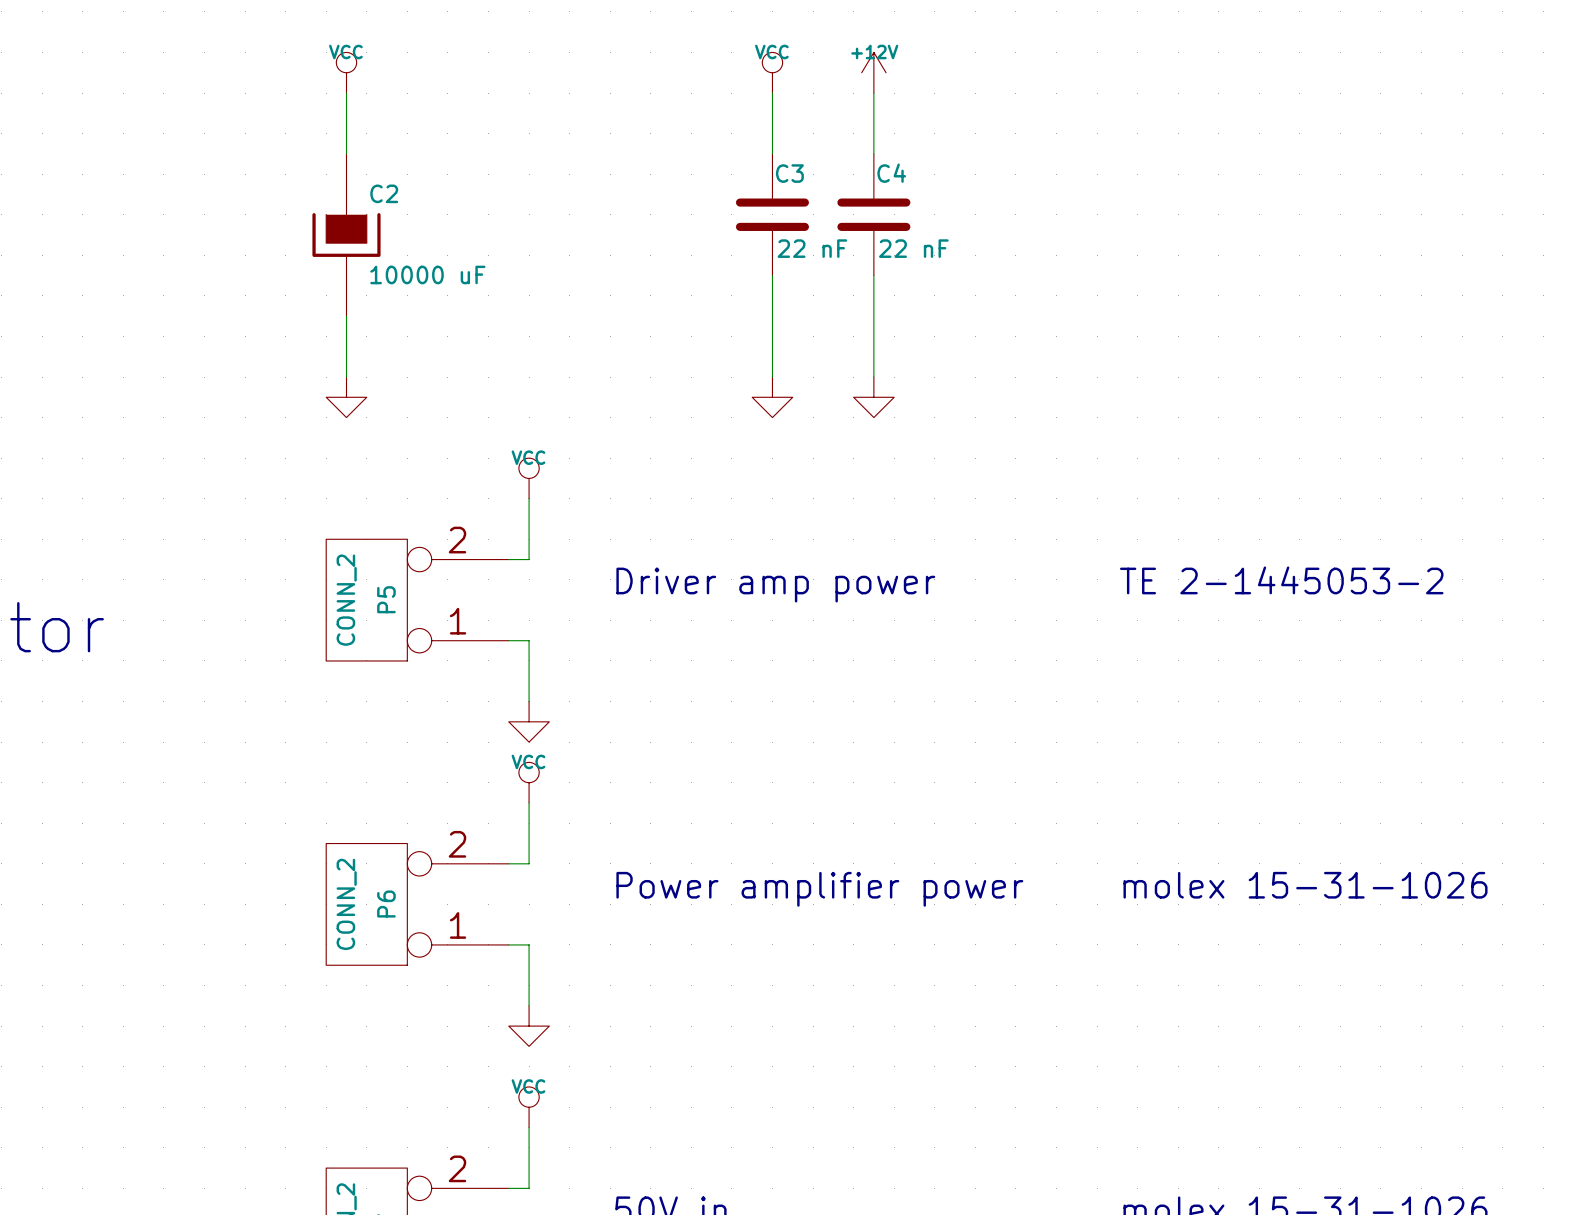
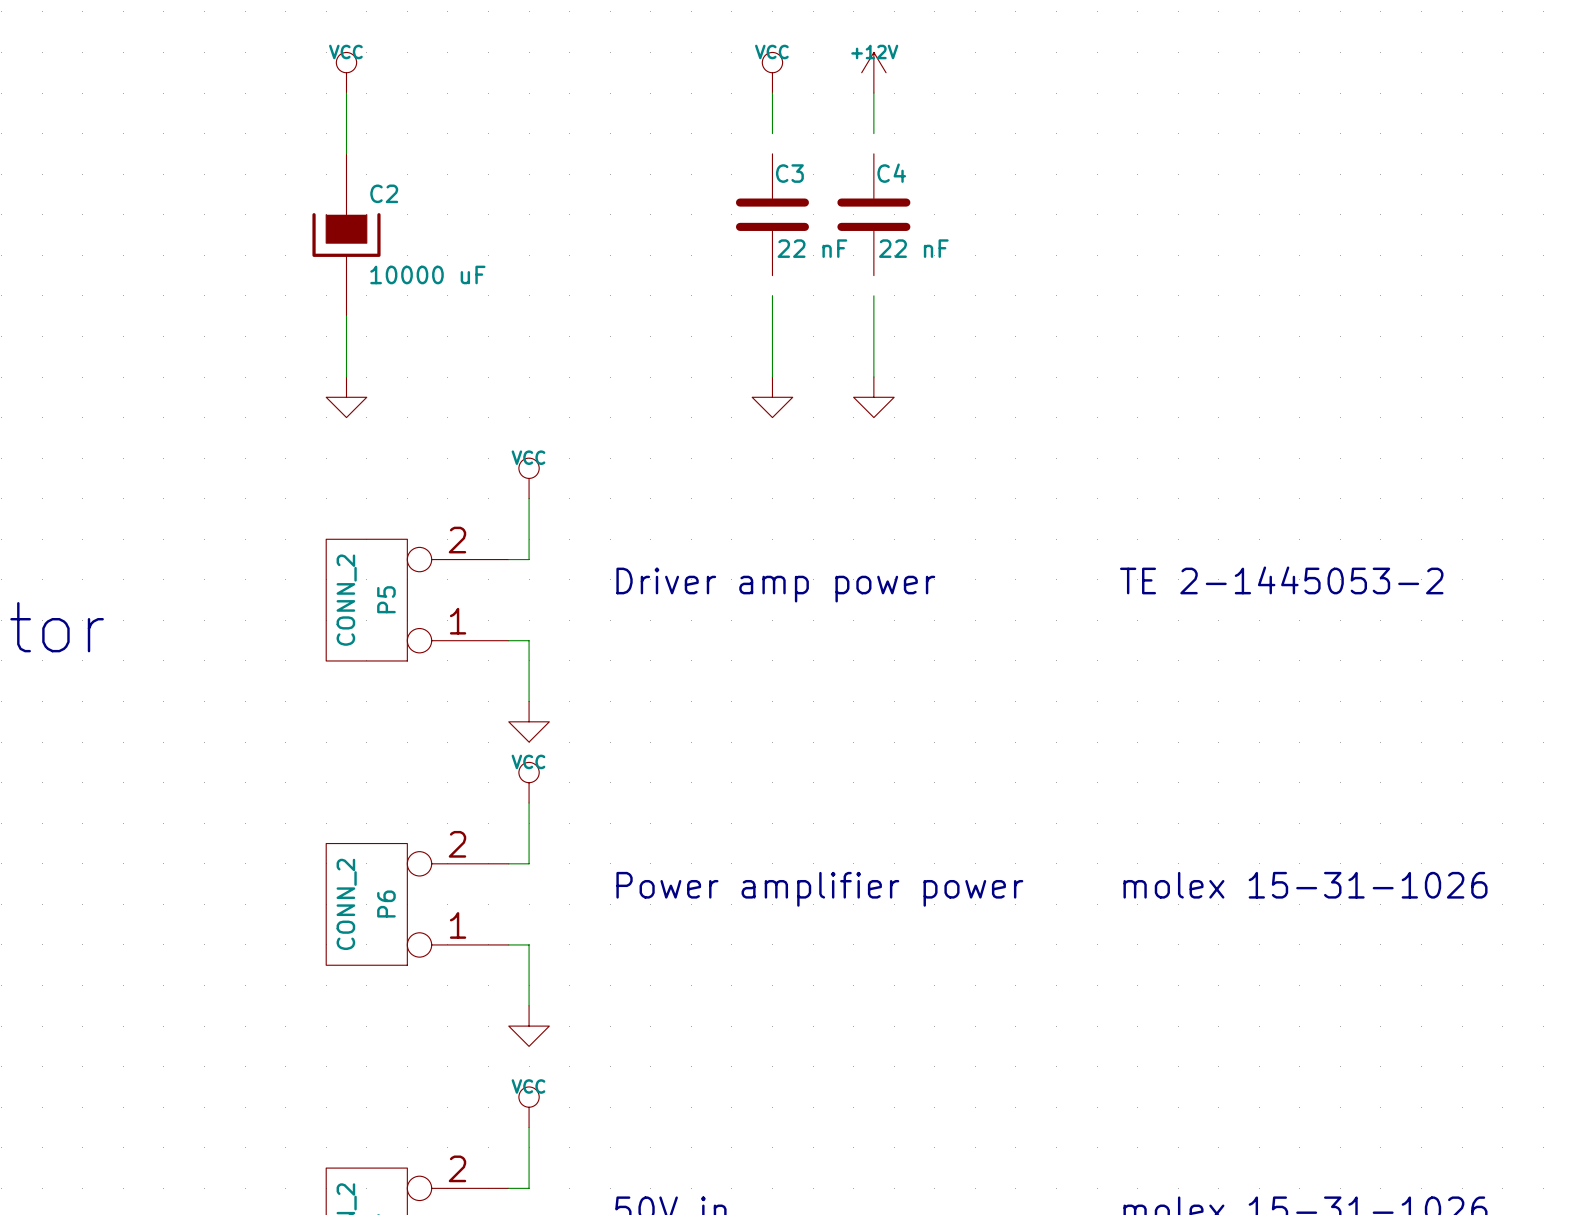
wire: (772, 133) (772, 153) -> none
wire: (873, 133) (873, 153) -> none
wire: (772, 275) (772, 295) -> none
wire: (873, 275) (873, 295) -> none

